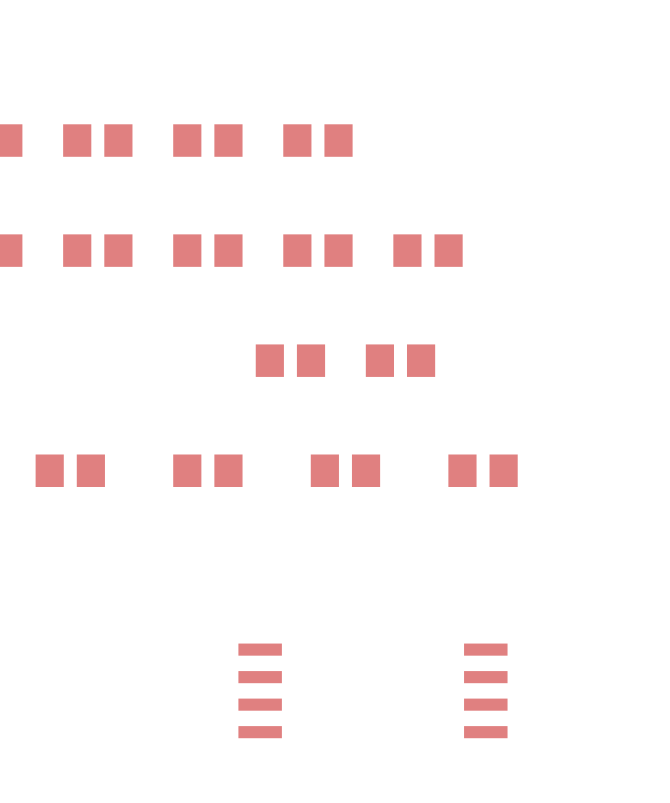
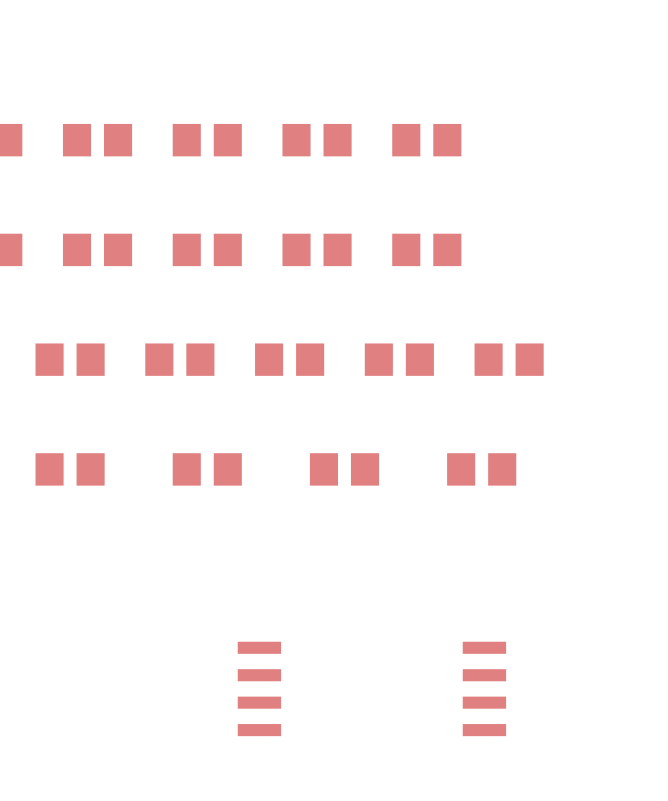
part: none -> (426, 140)
part: none -> (70, 359)
part: none -> (179, 359)
part: none -> (509, 359)

